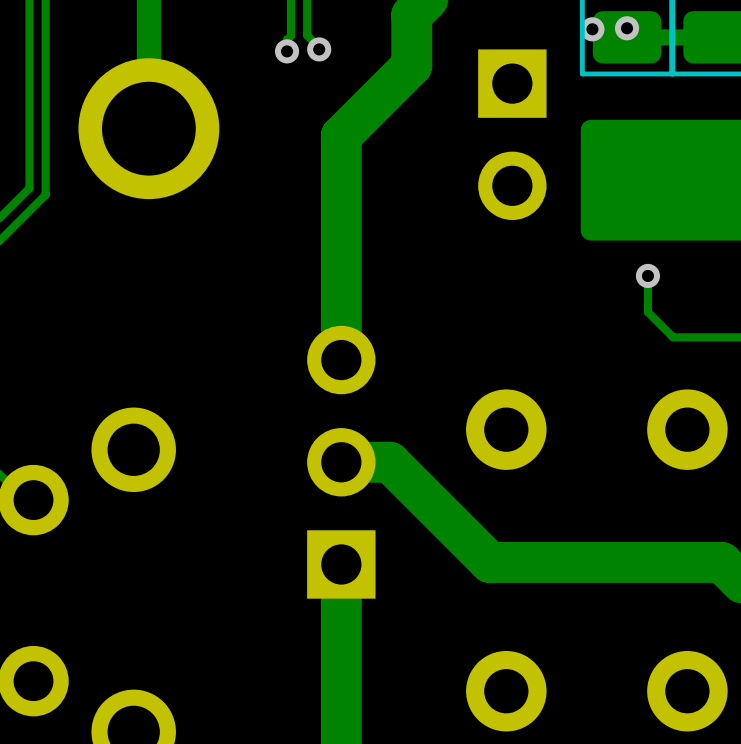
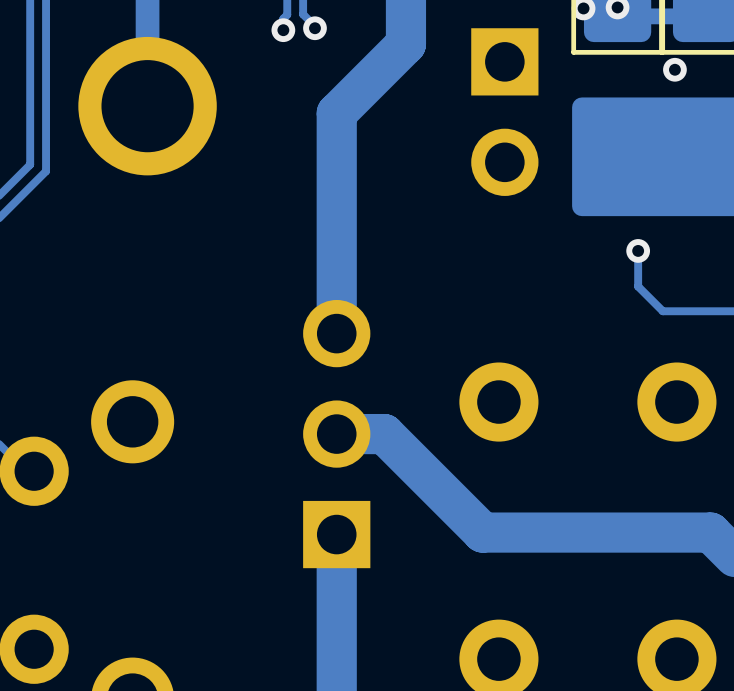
via: none -> (674, 69)

